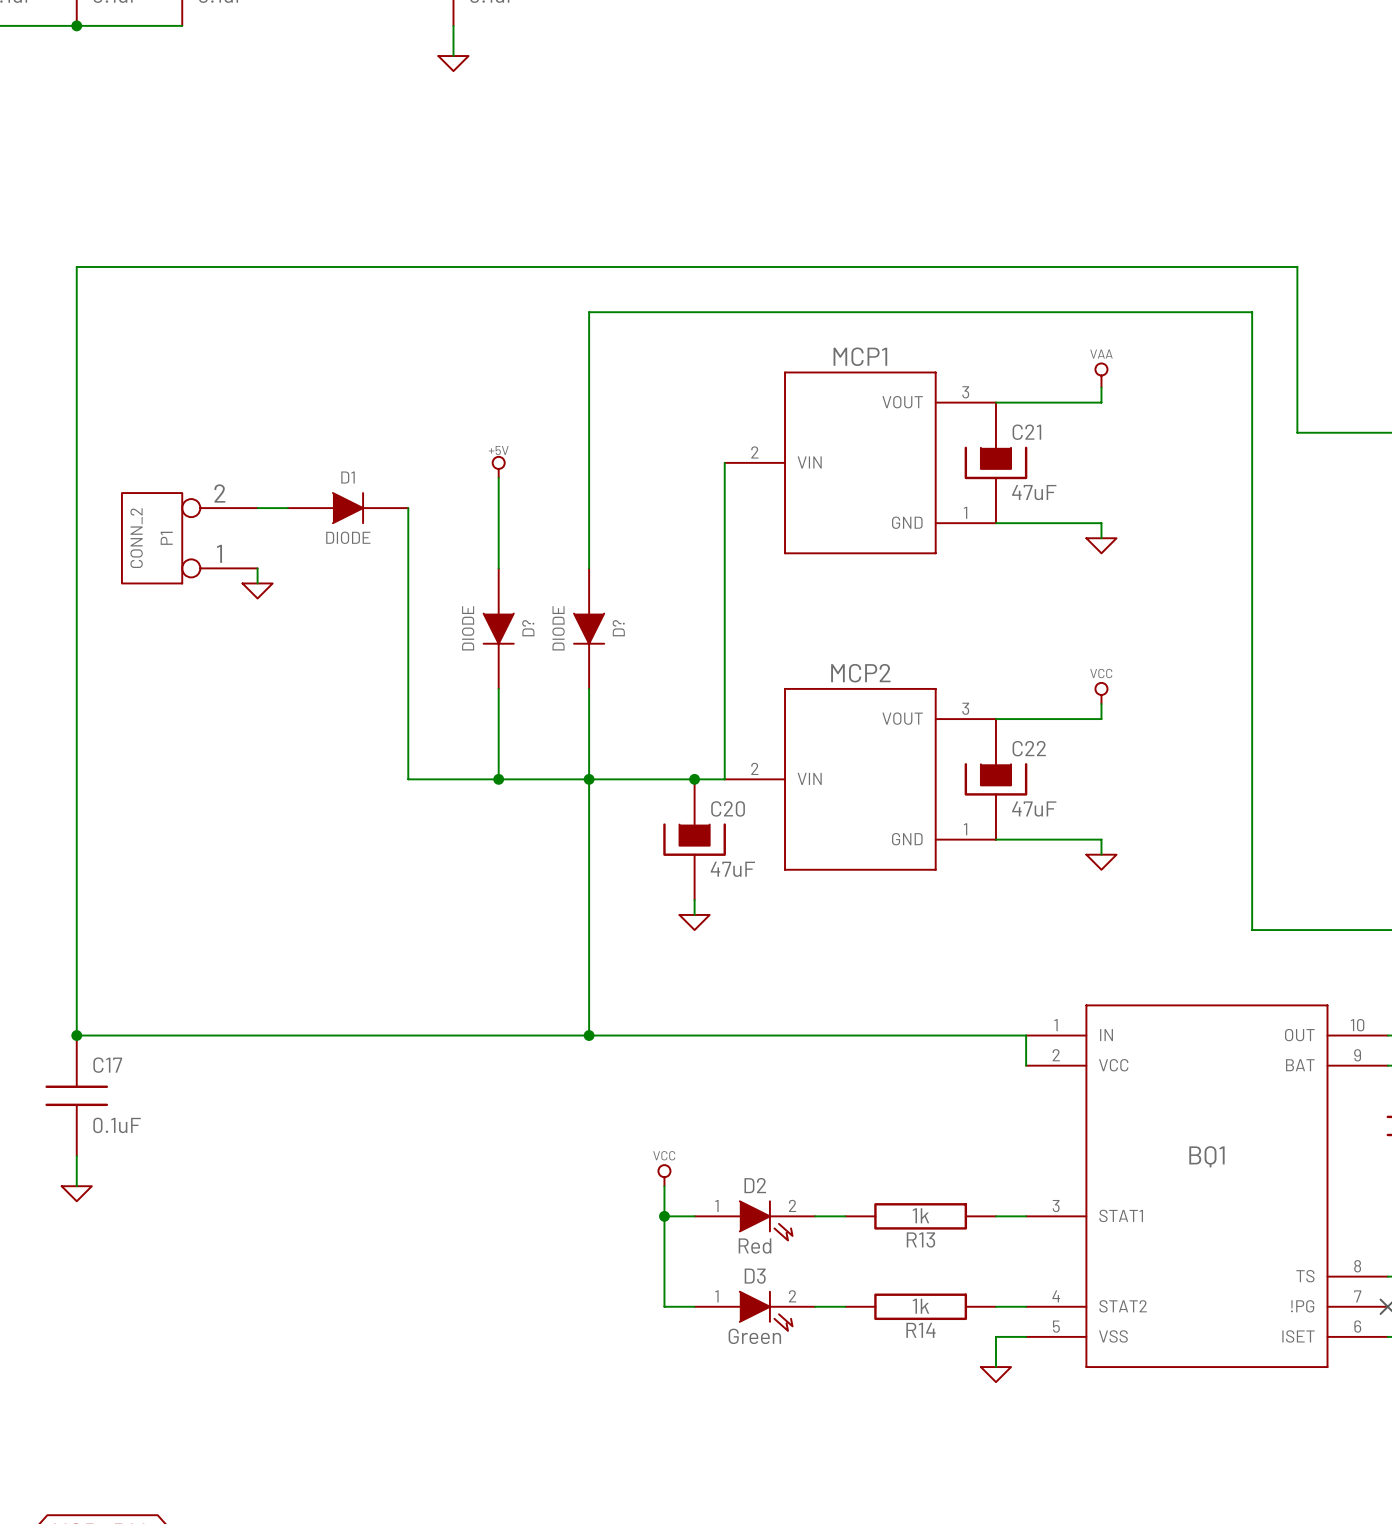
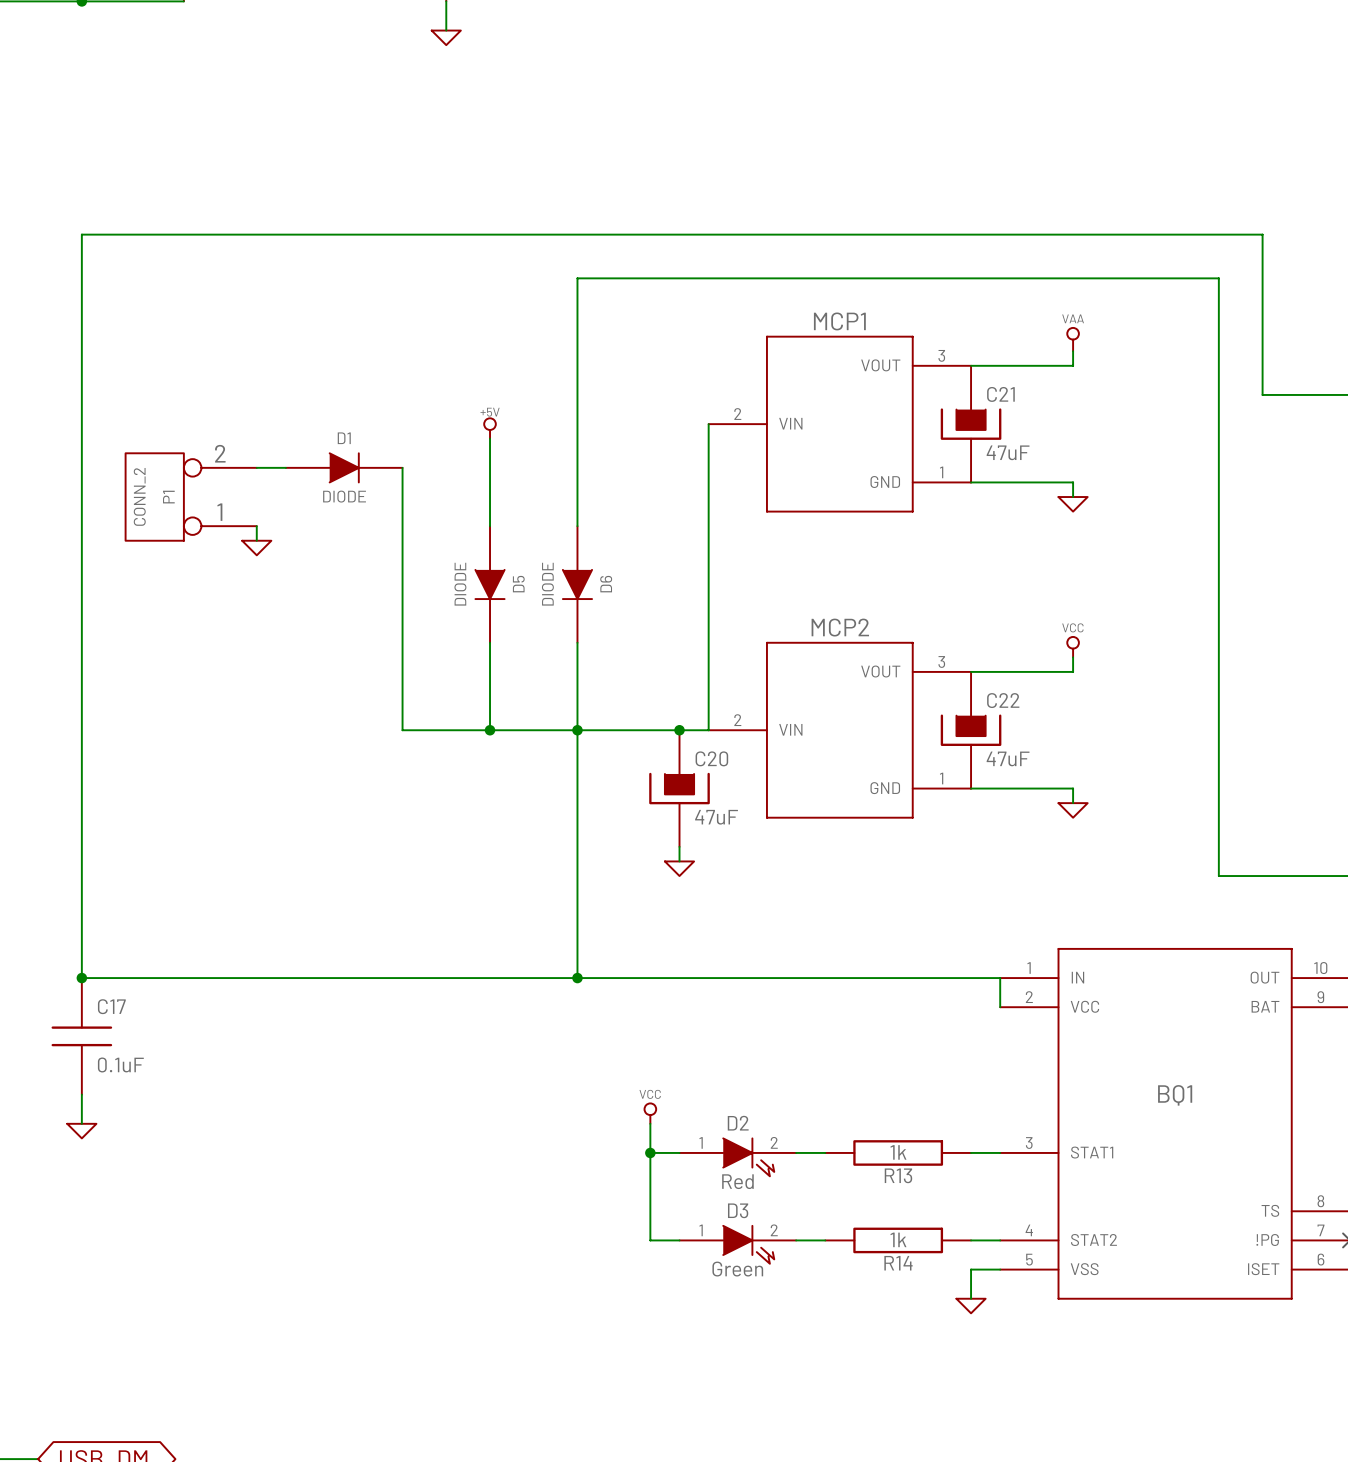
D? name: D? (528, 628) -> D5 (518, 584)
D? name: D? (618, 628) -> D6 (606, 584)

